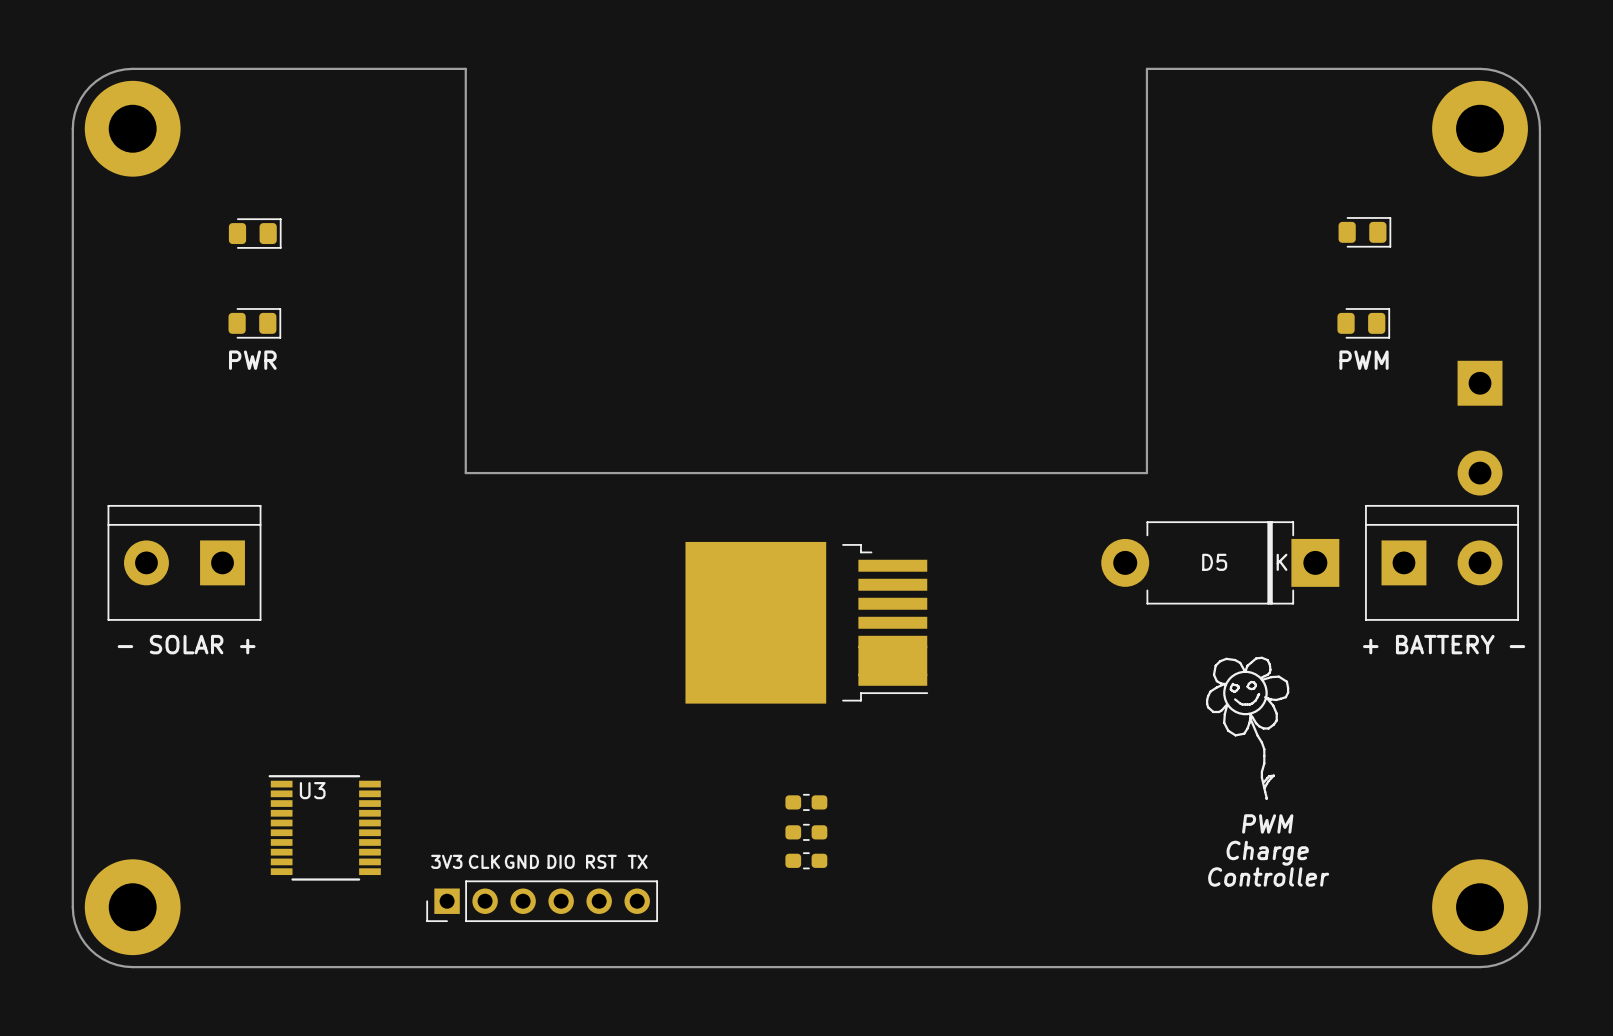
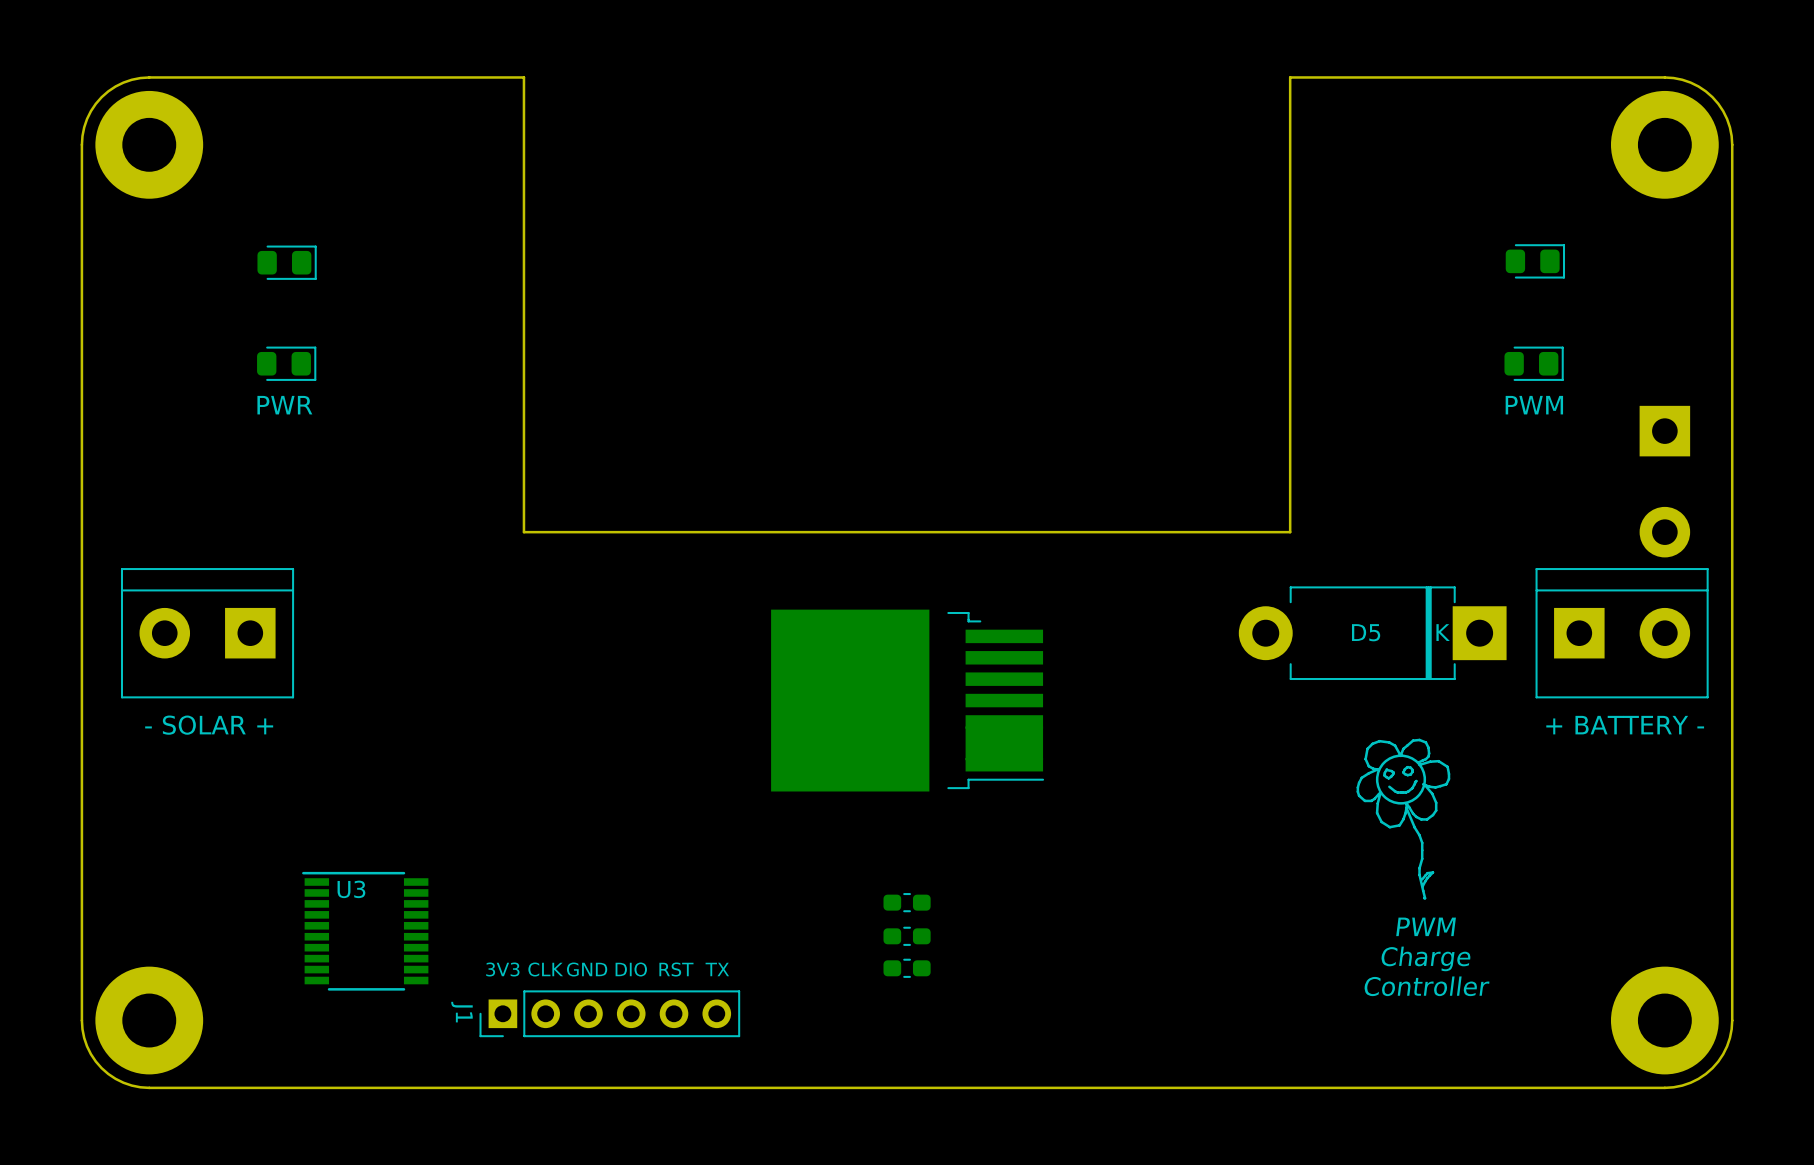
J1 name: none -> J1 (461, 1012)

